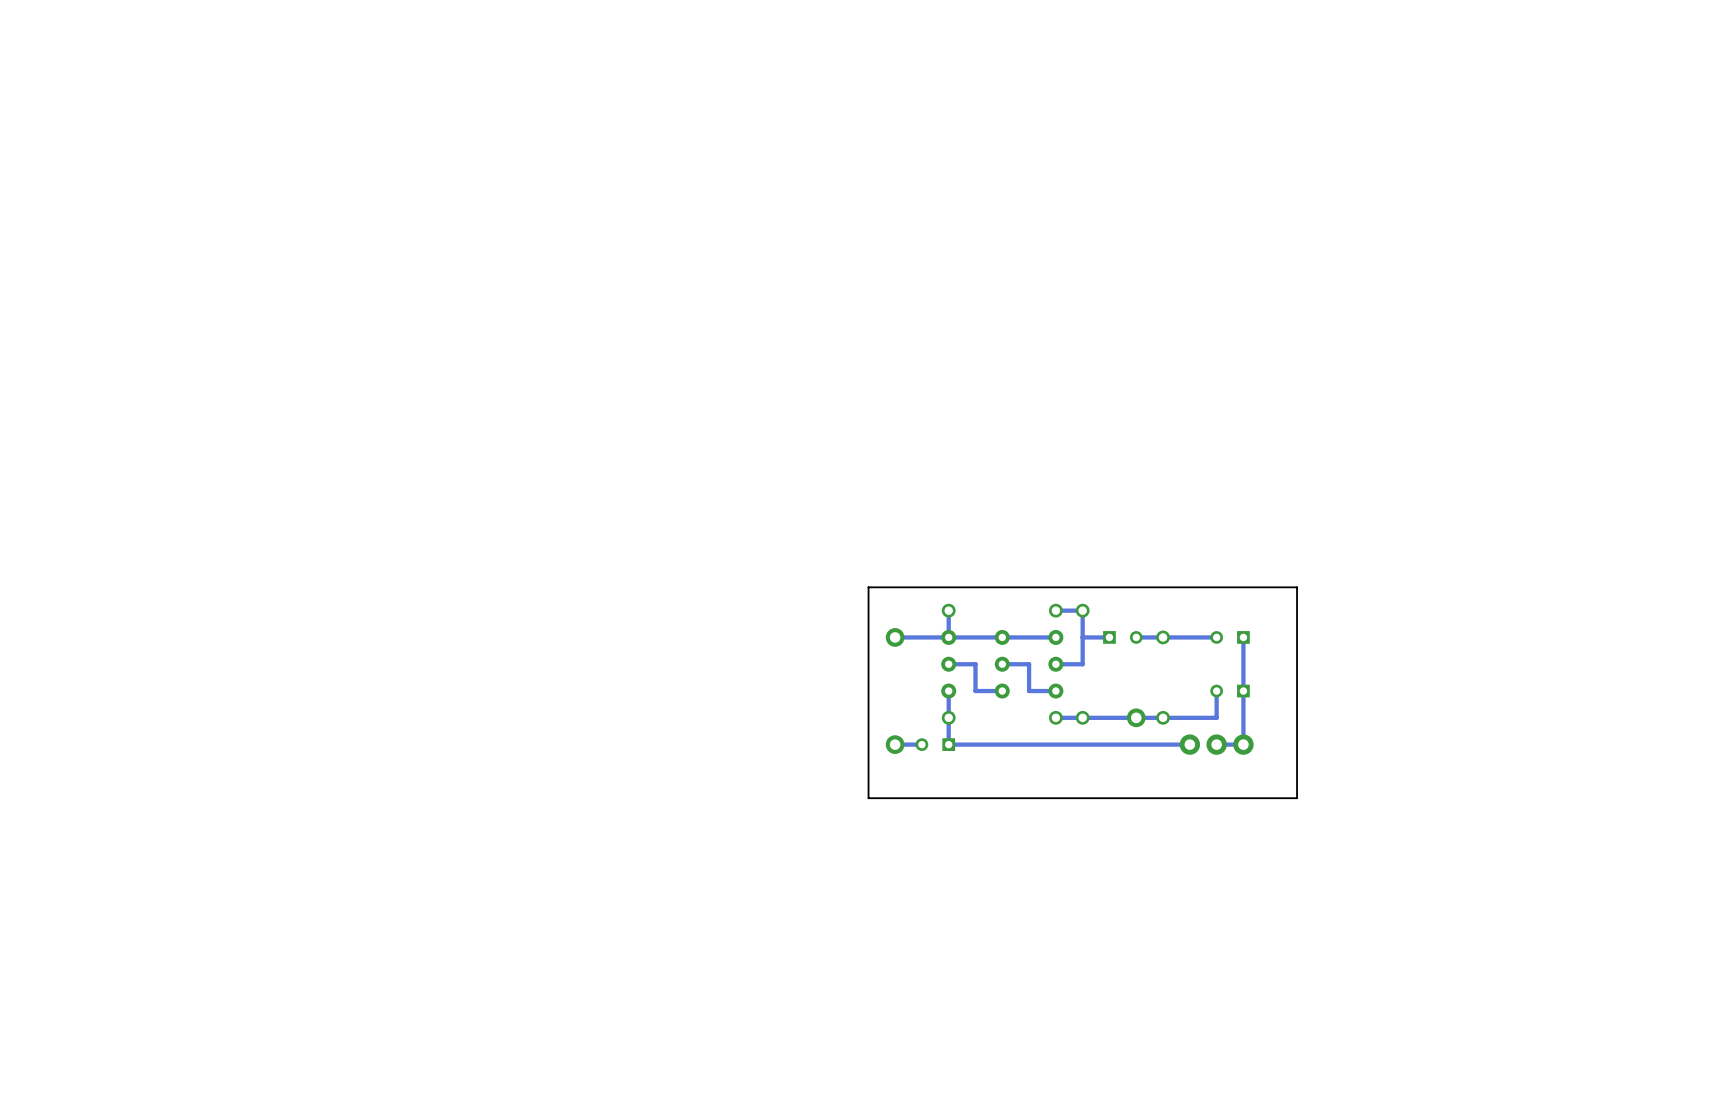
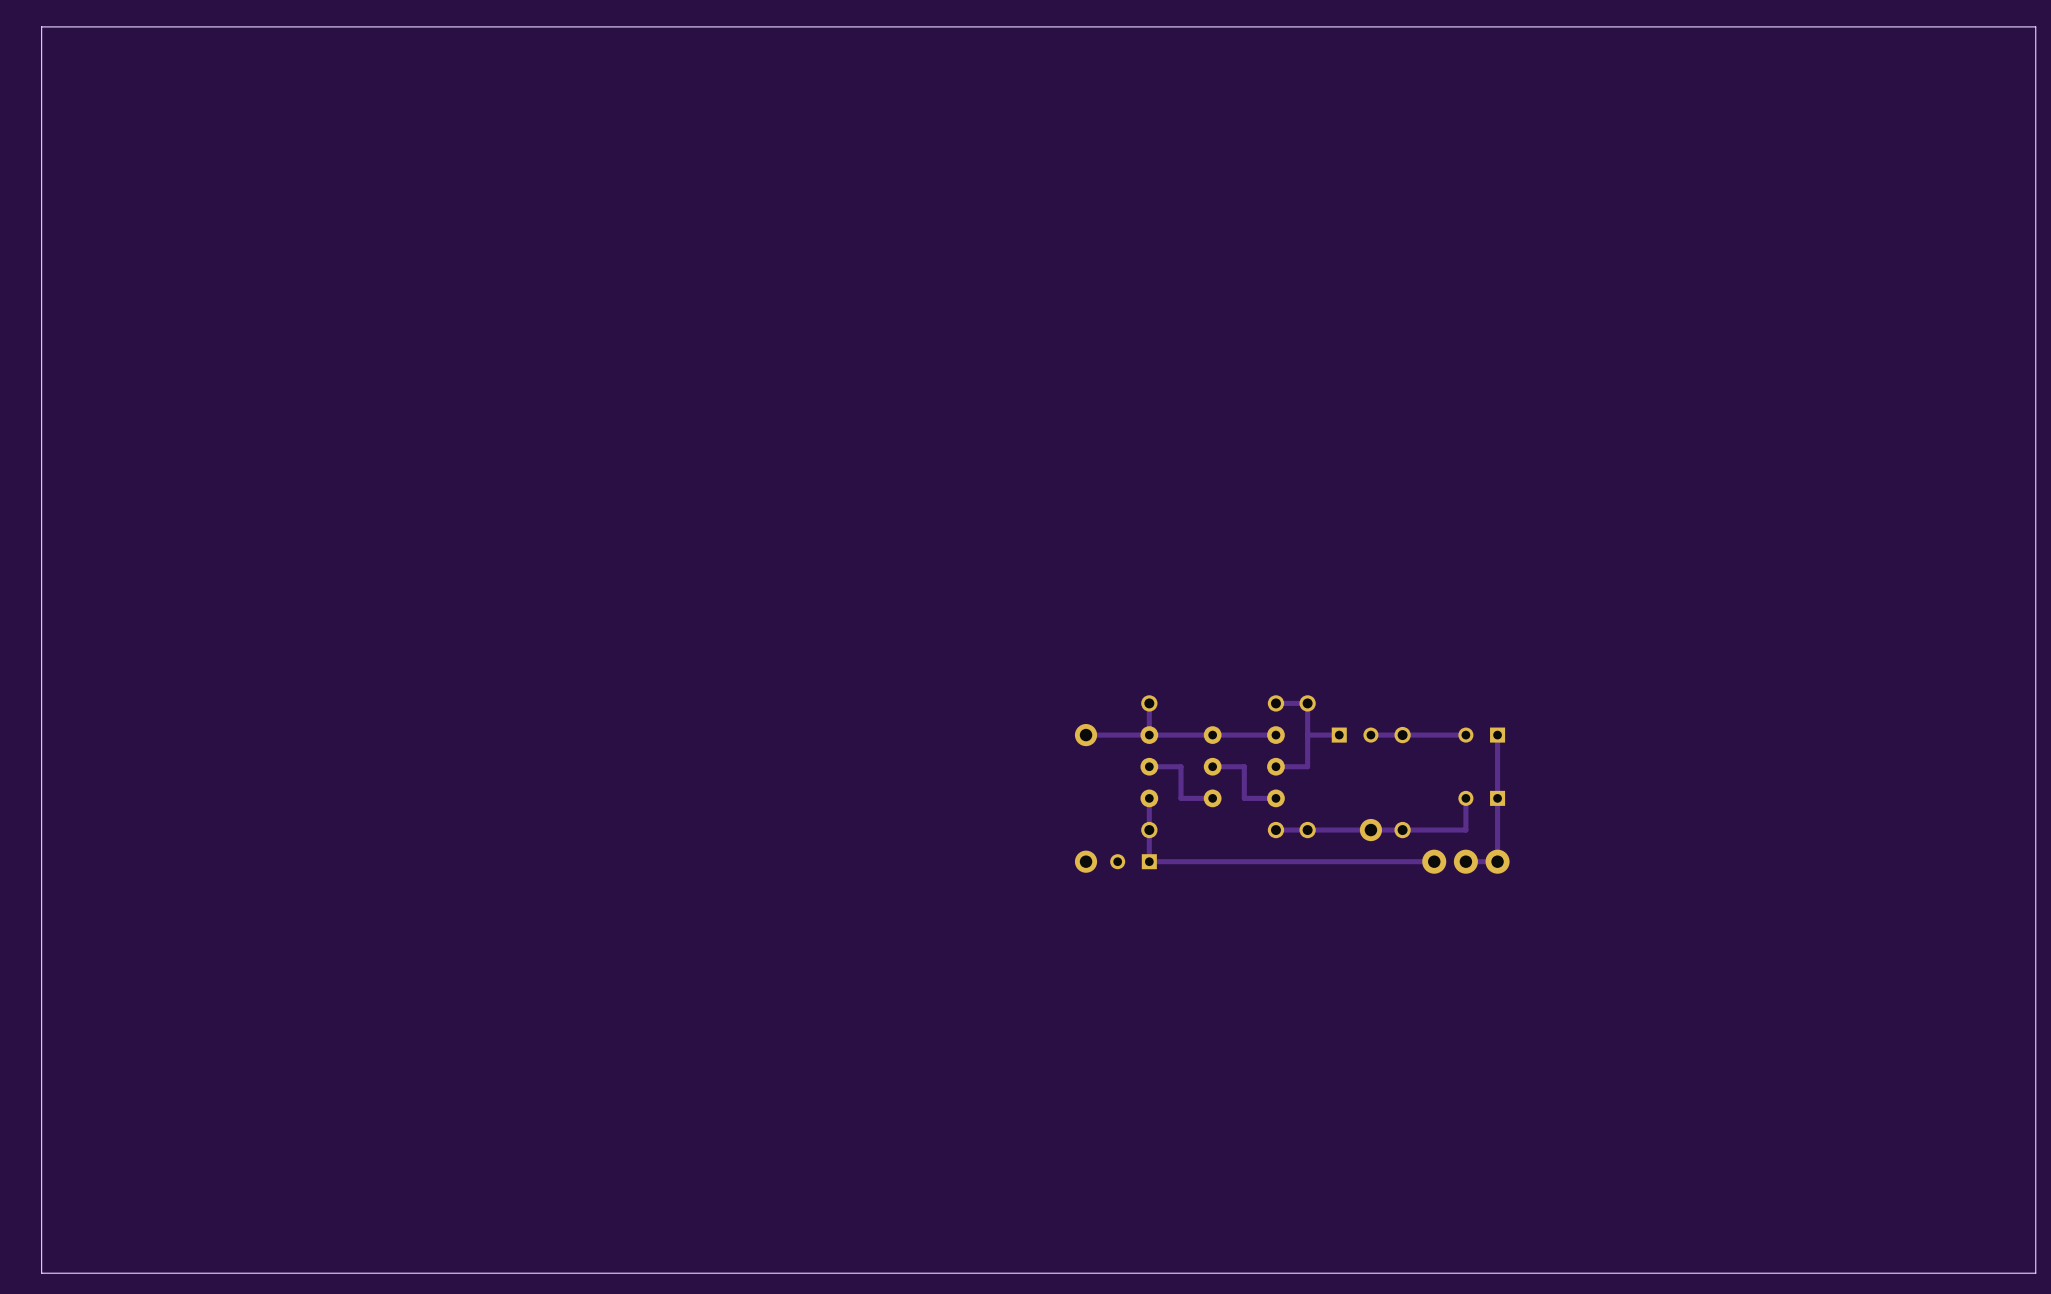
board edge: none -> (2035, 26) (41, 26) (41, 1273) (2035, 1273) (2035, 26)
board edge: (1297, 587) (868, 587) (868, 798) (1297, 798) (1297, 587) -> none
track: (921, 744) (895, 744) -> none

